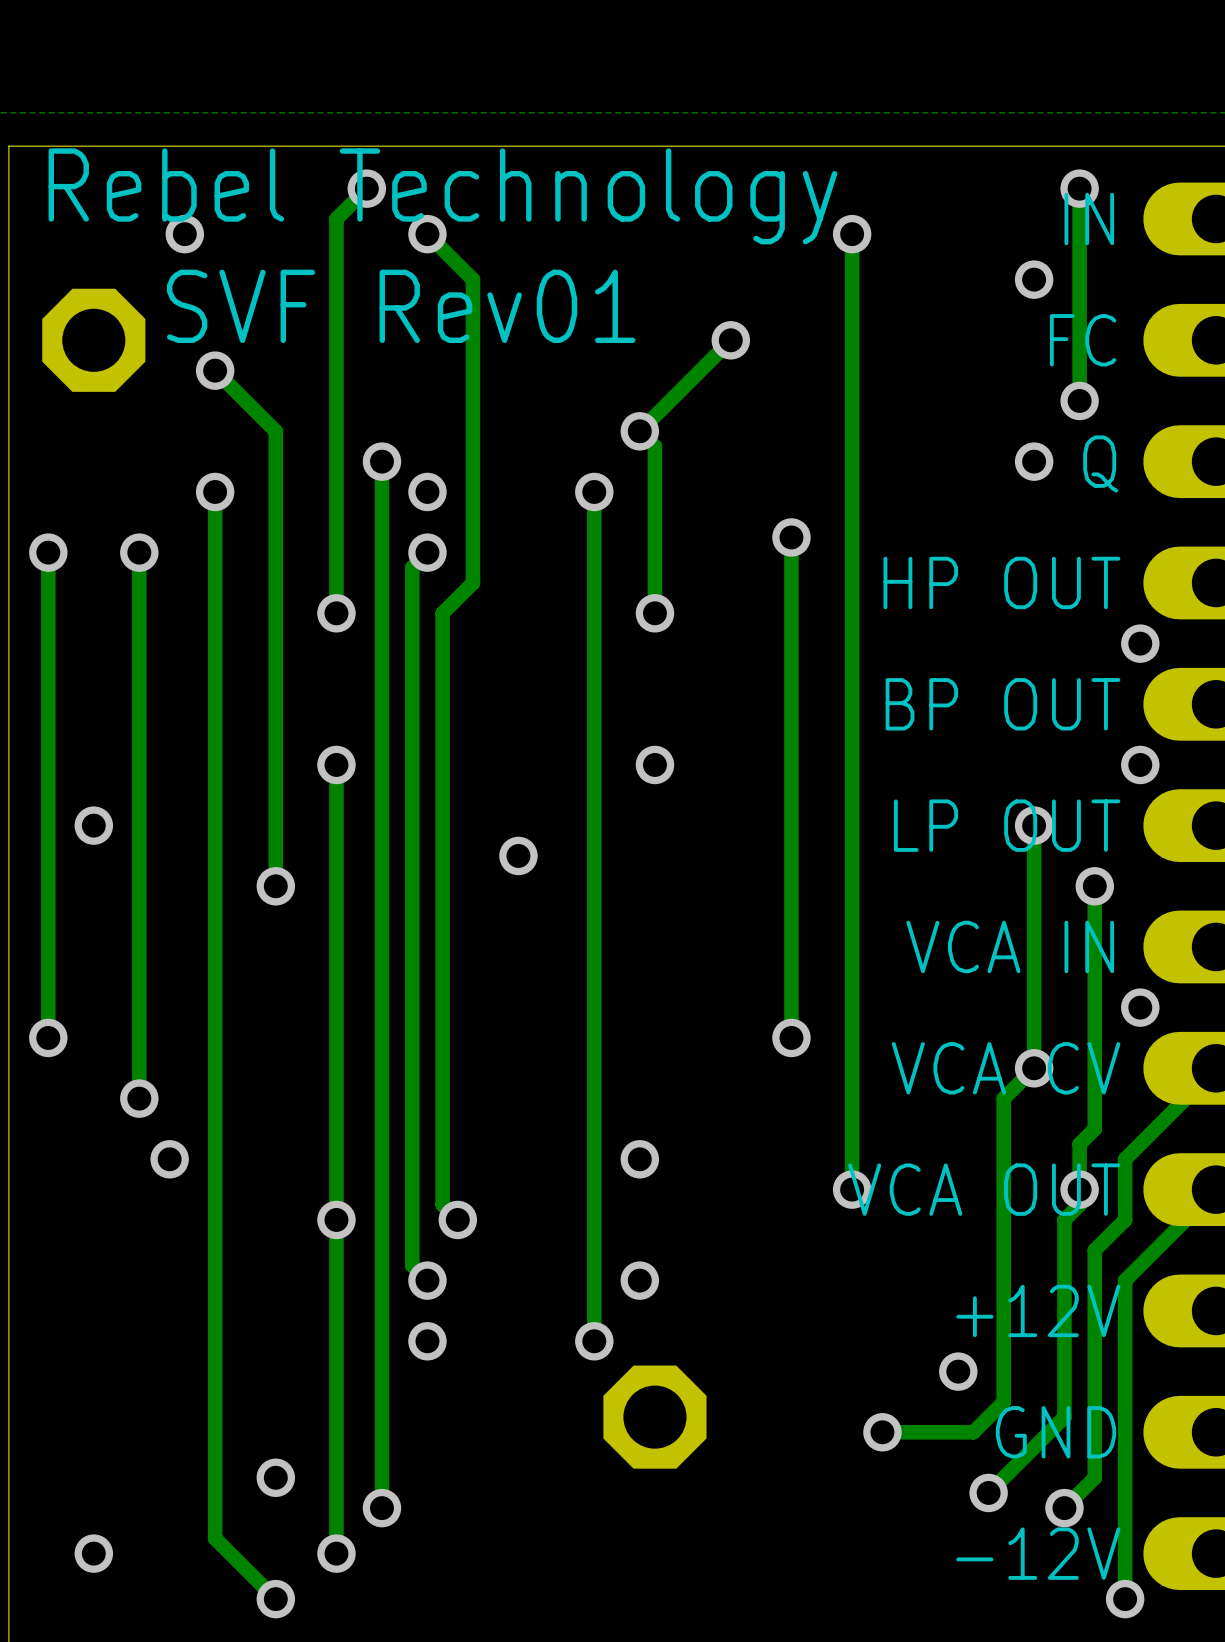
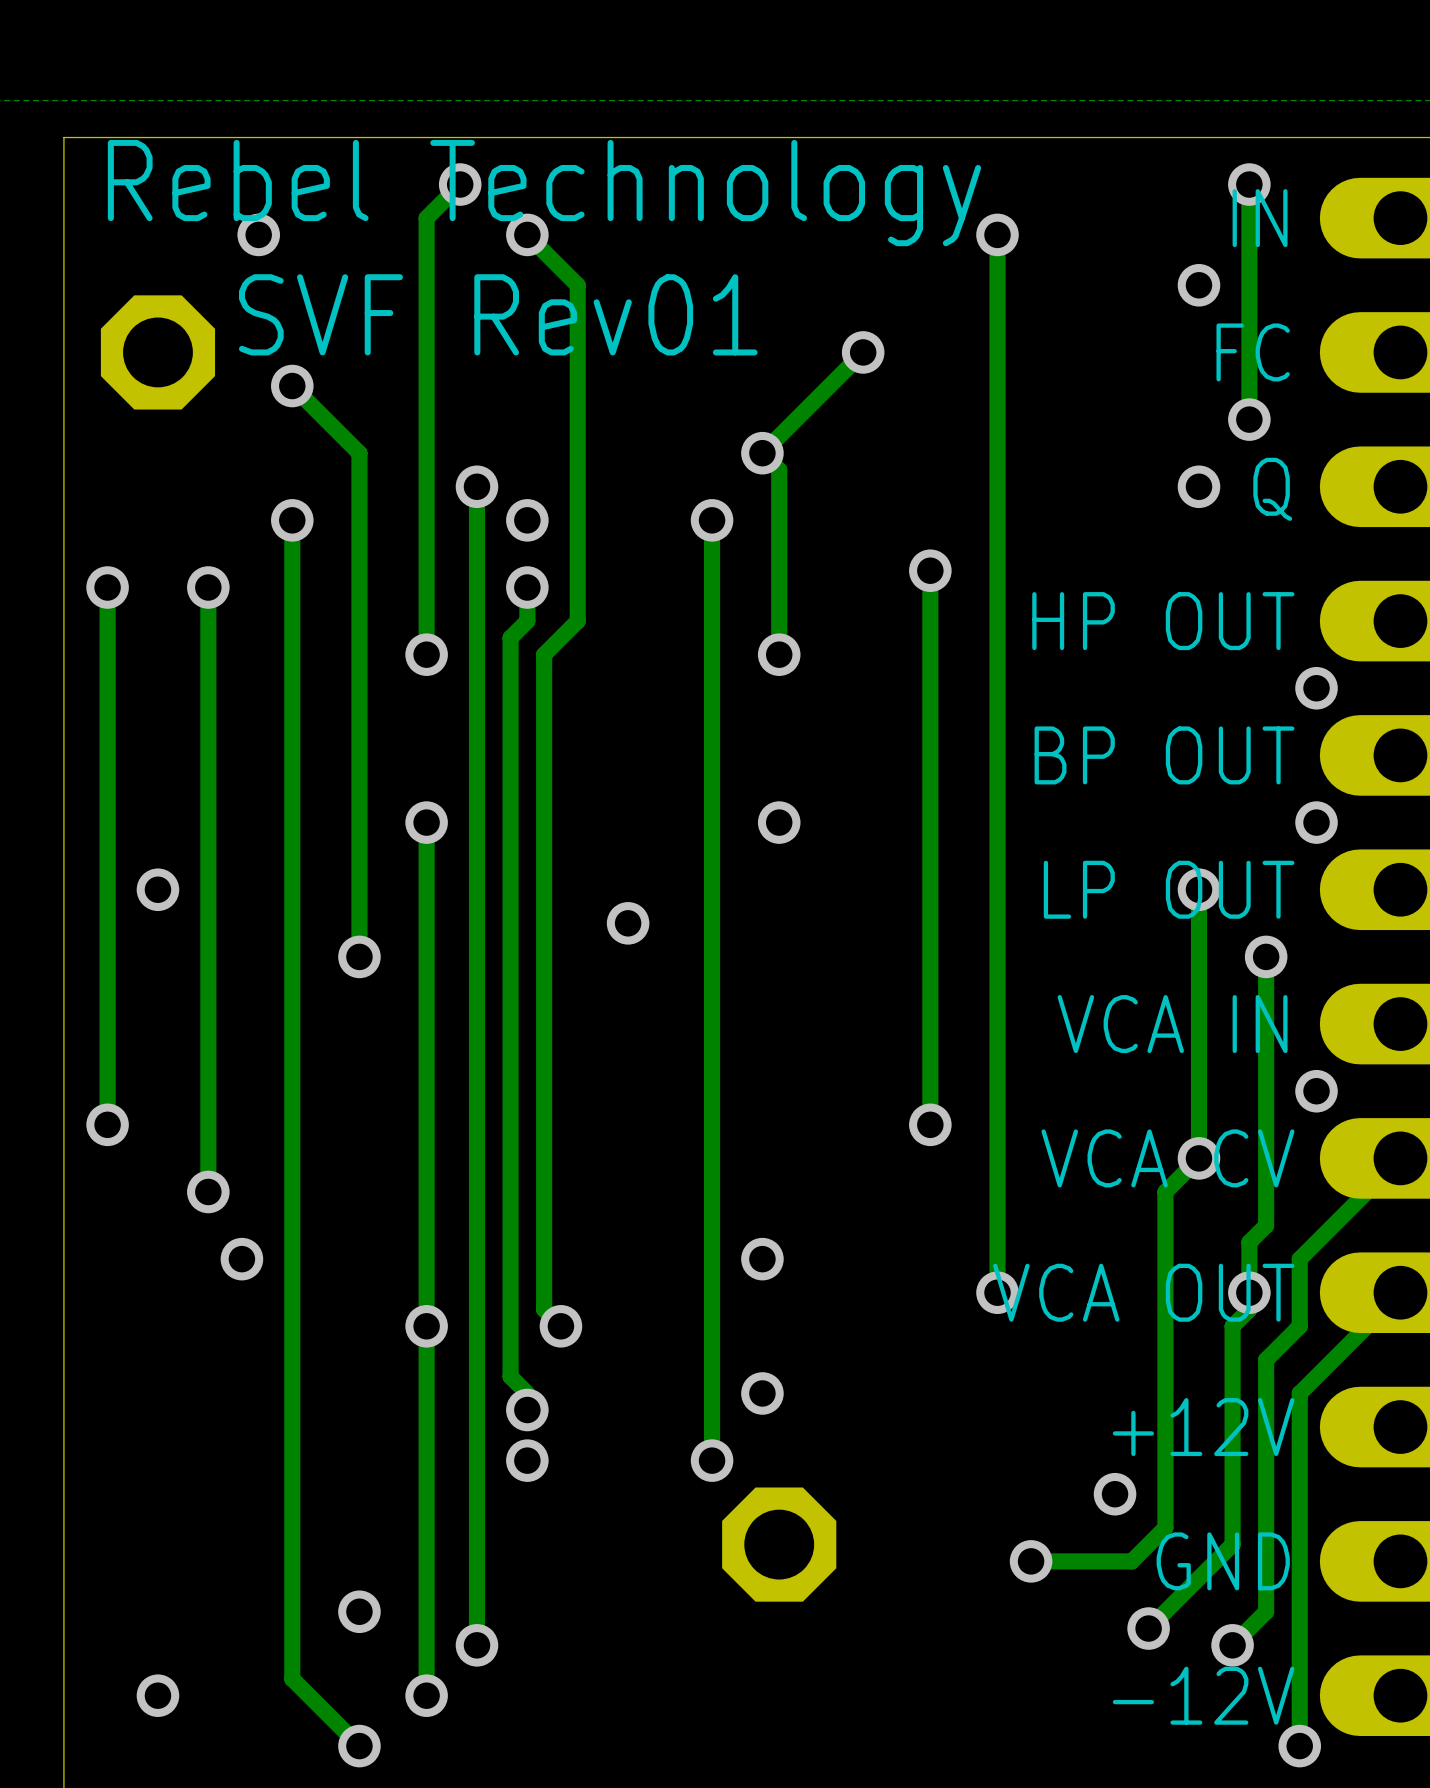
track: (427, 552) (412, 567) (412, 598) -> (527, 587) (527, 621) (510, 637)
via position: (427, 1280) -> (527, 1410)

